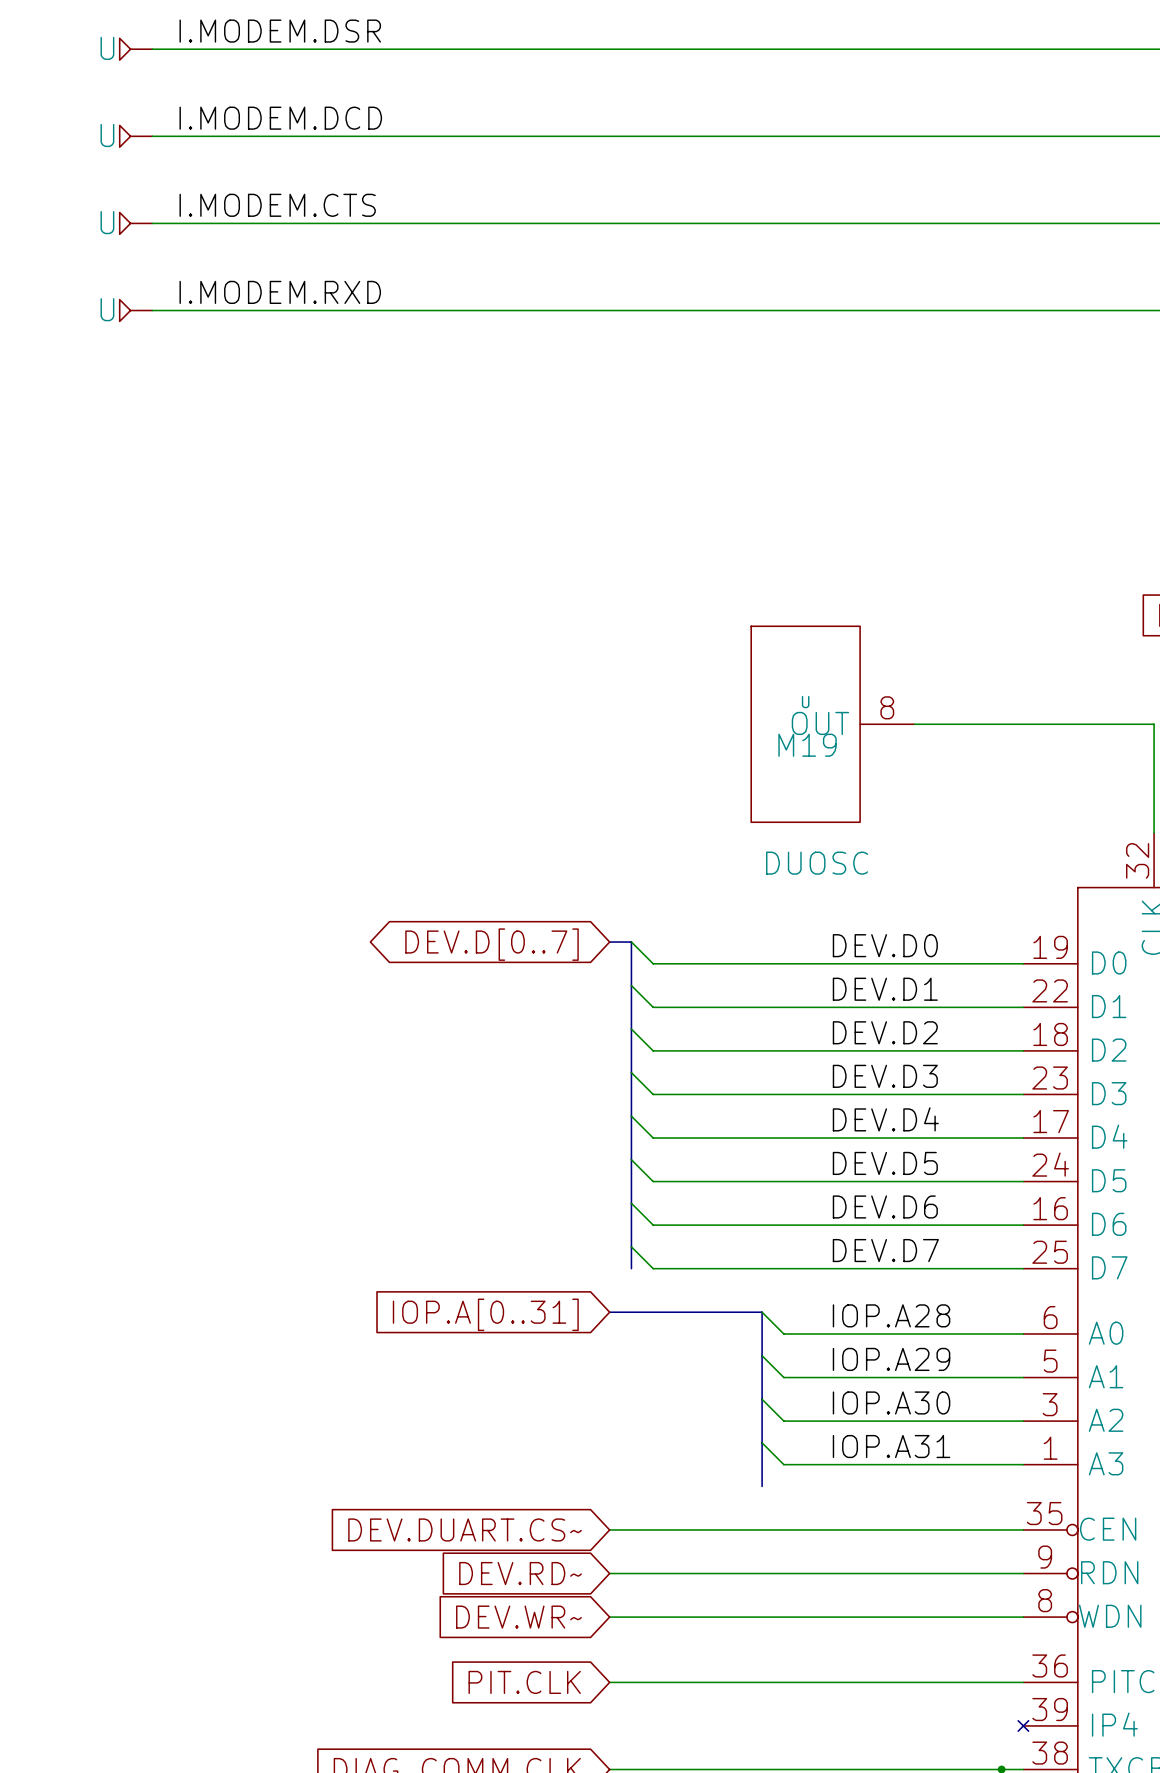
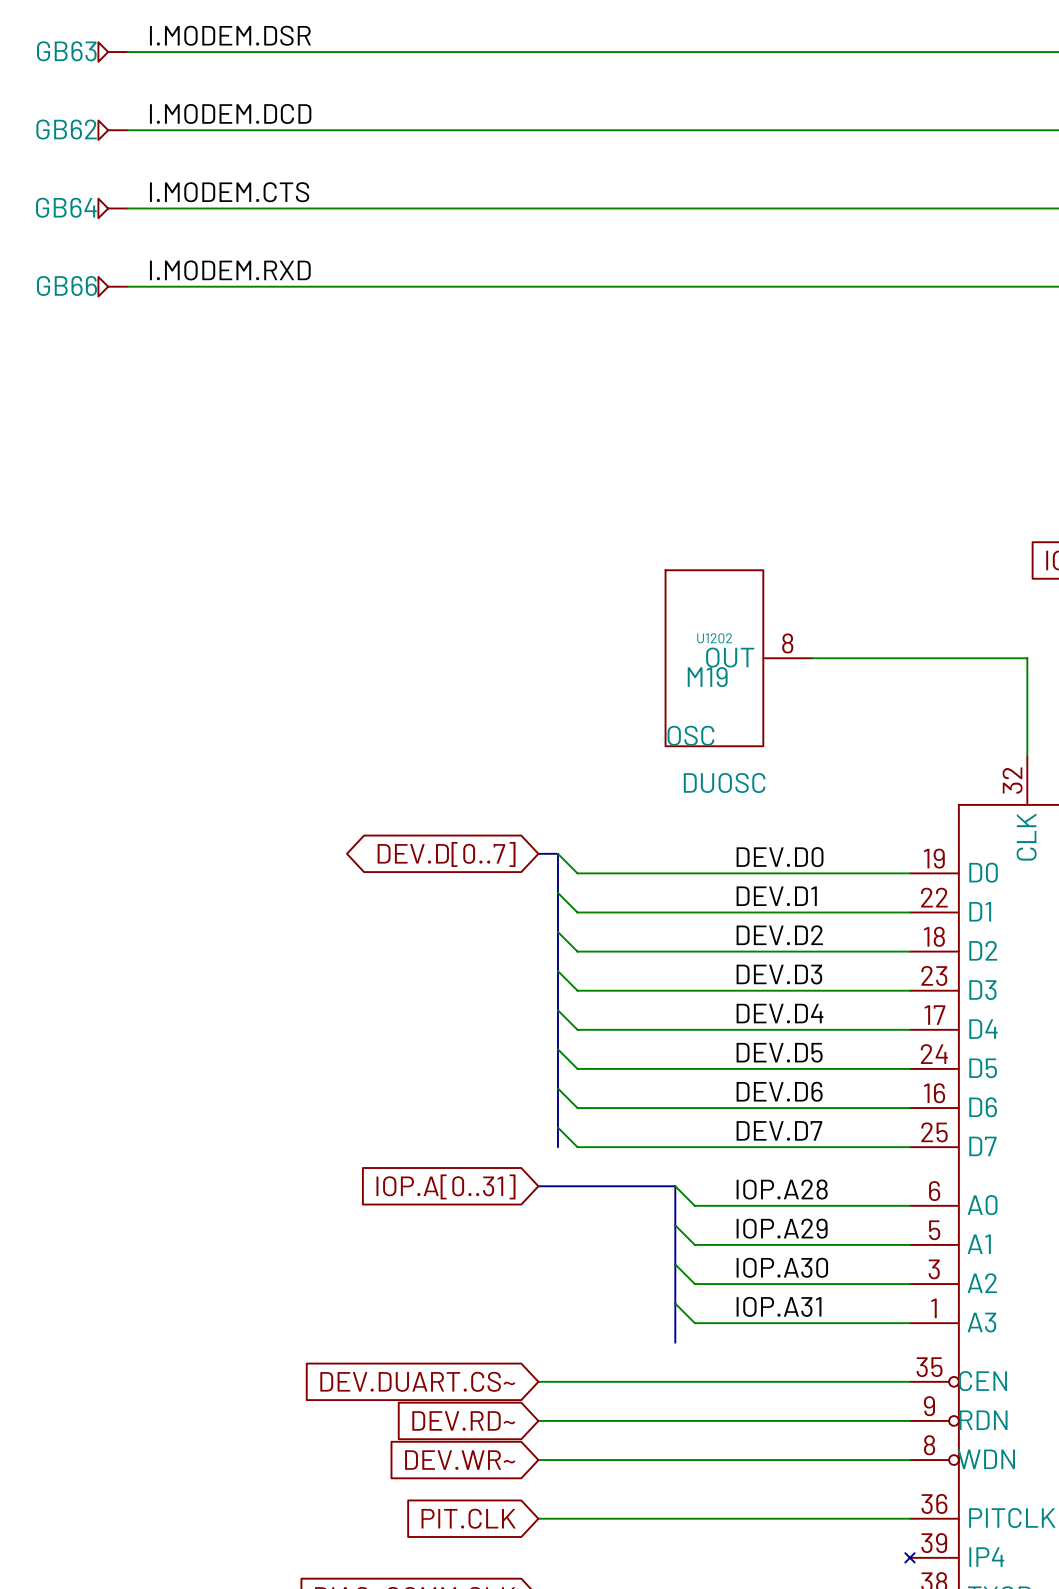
U name: U (107, 48) -> GB63 (66, 51)
U name: U (107, 135) -> GB62 (66, 129)
U name: U (107, 222) -> GB64 (66, 207)
U name: U (107, 309) -> GB66 (67, 285)
U name: U (805, 702) -> U1202 (714, 638)
U value: none -> OSC (690, 735)

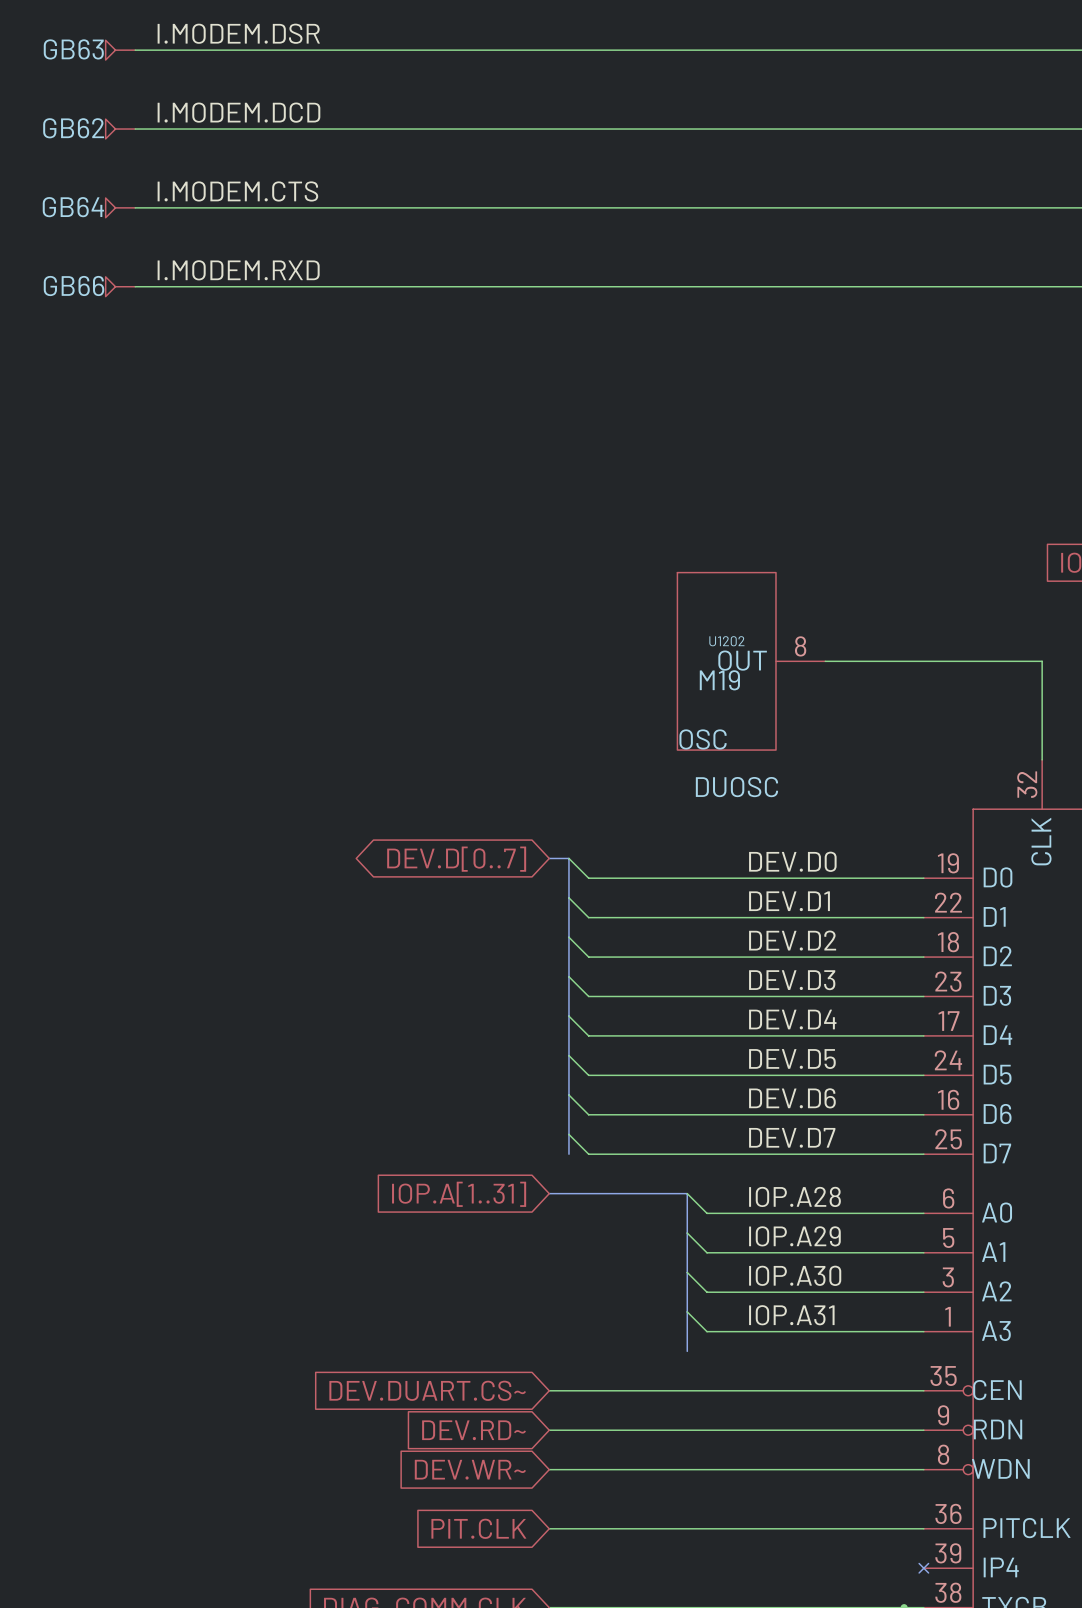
global label: IOP.A[0..31] (445, 1186) -> IOP.A[1..31] (459, 1194)

